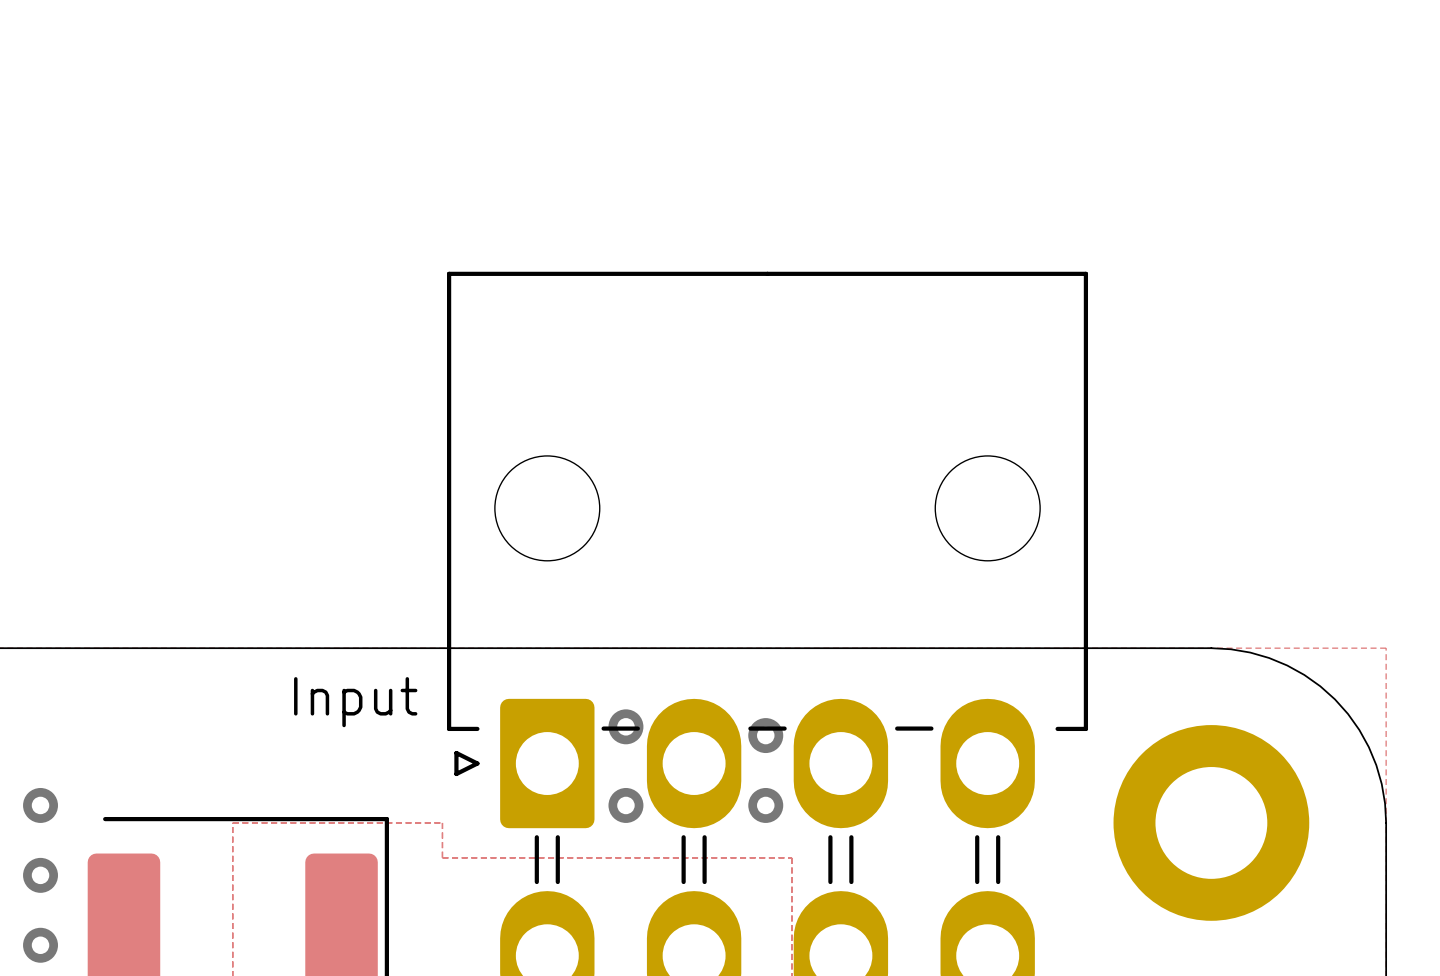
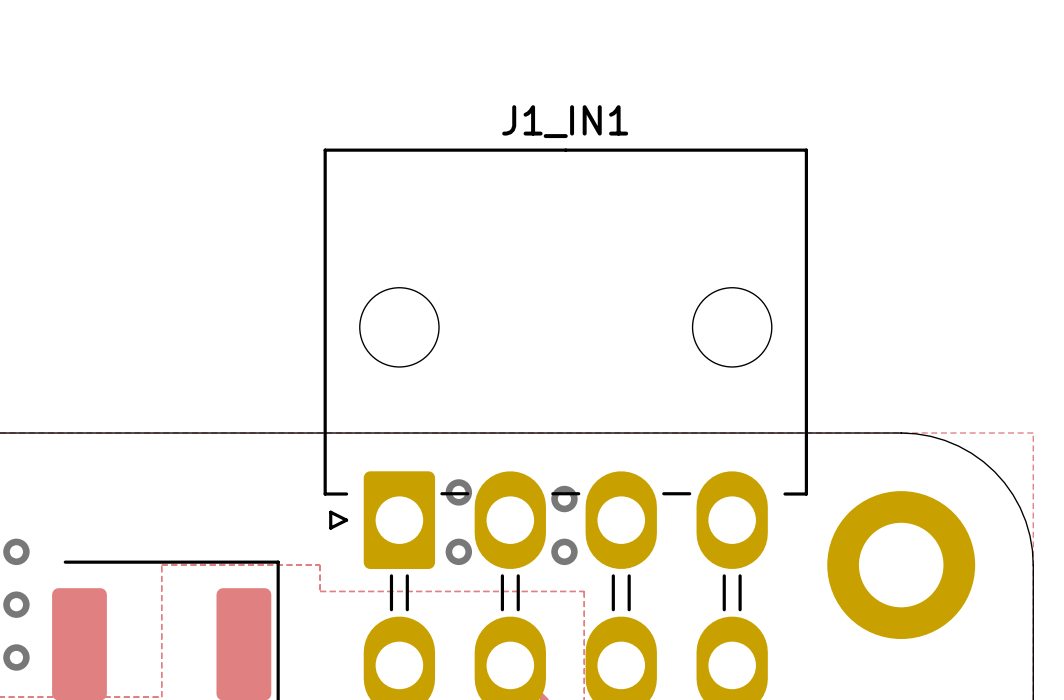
J1_IN1 name: none -> J1_IN1 (565, 121)
text: Input (355, 702) -> none

